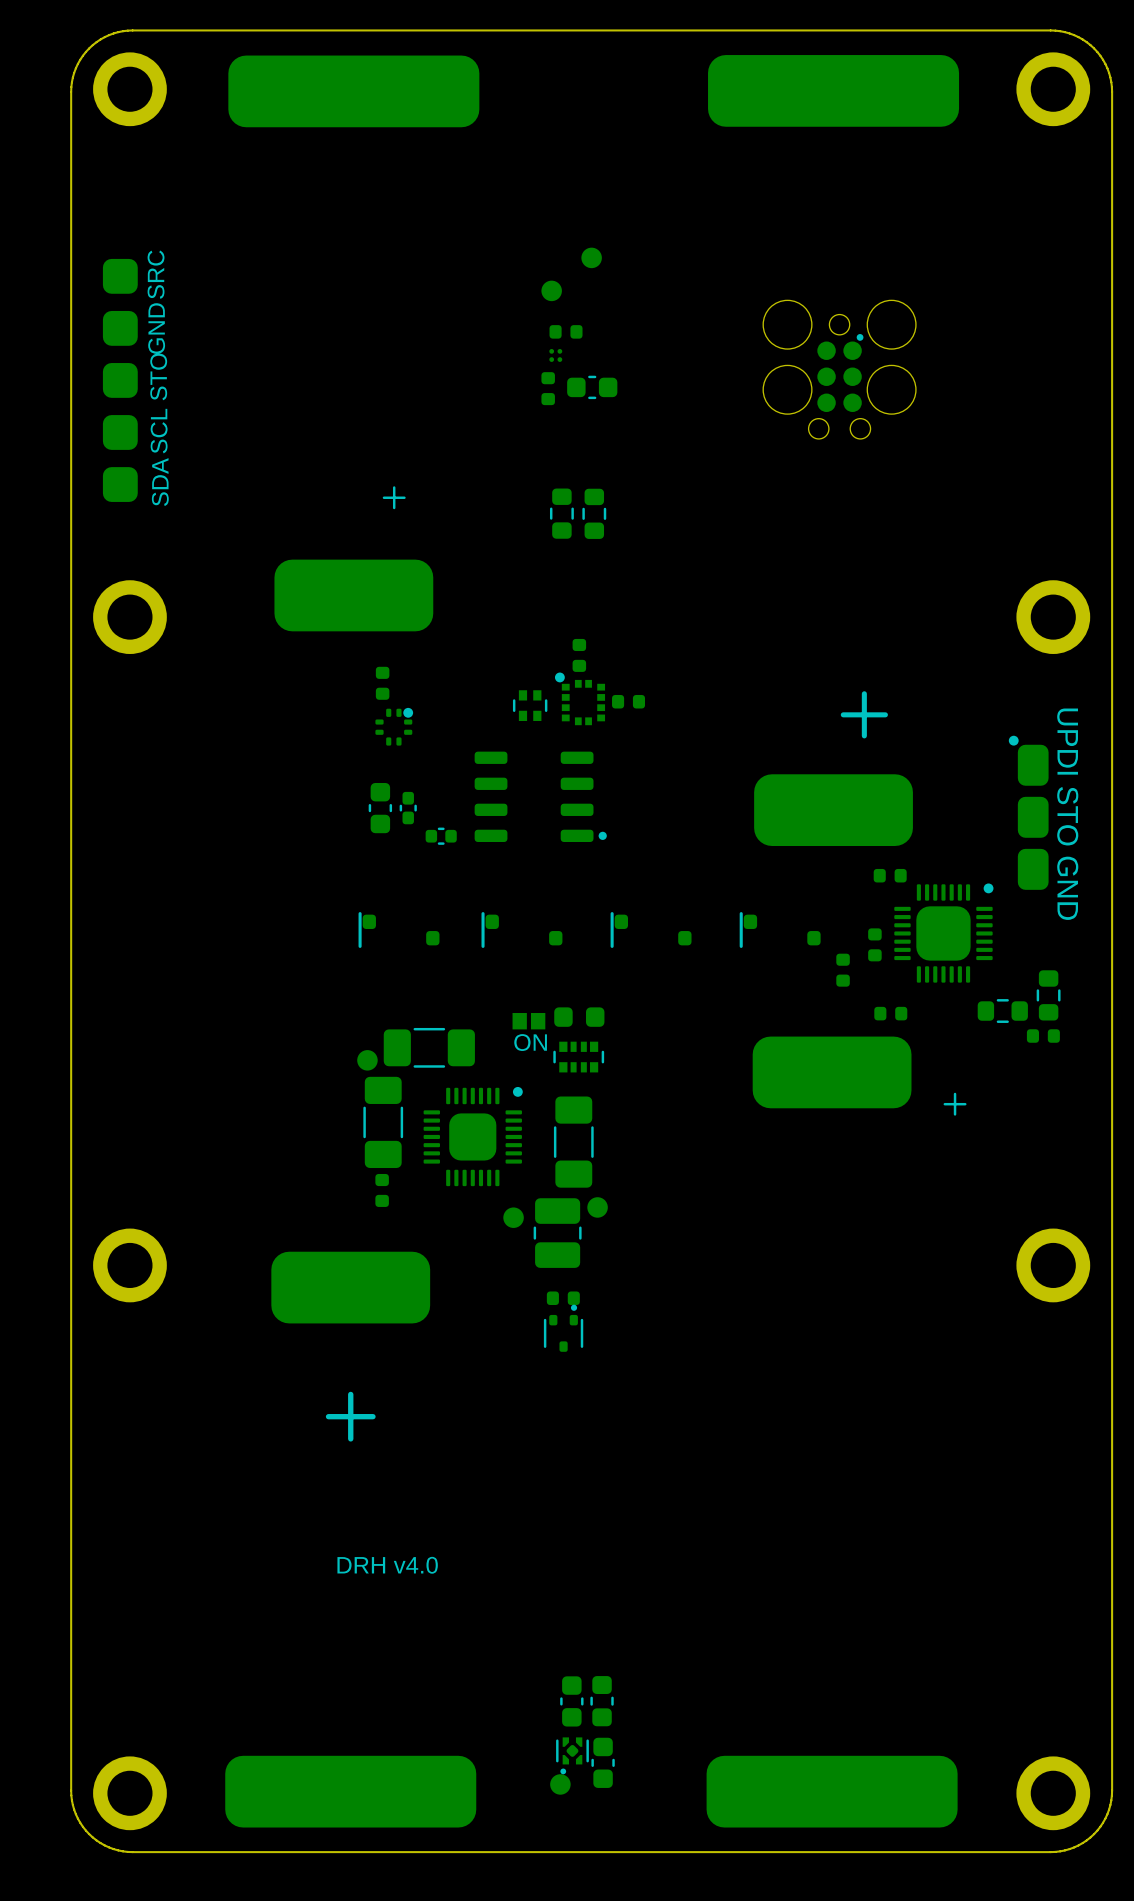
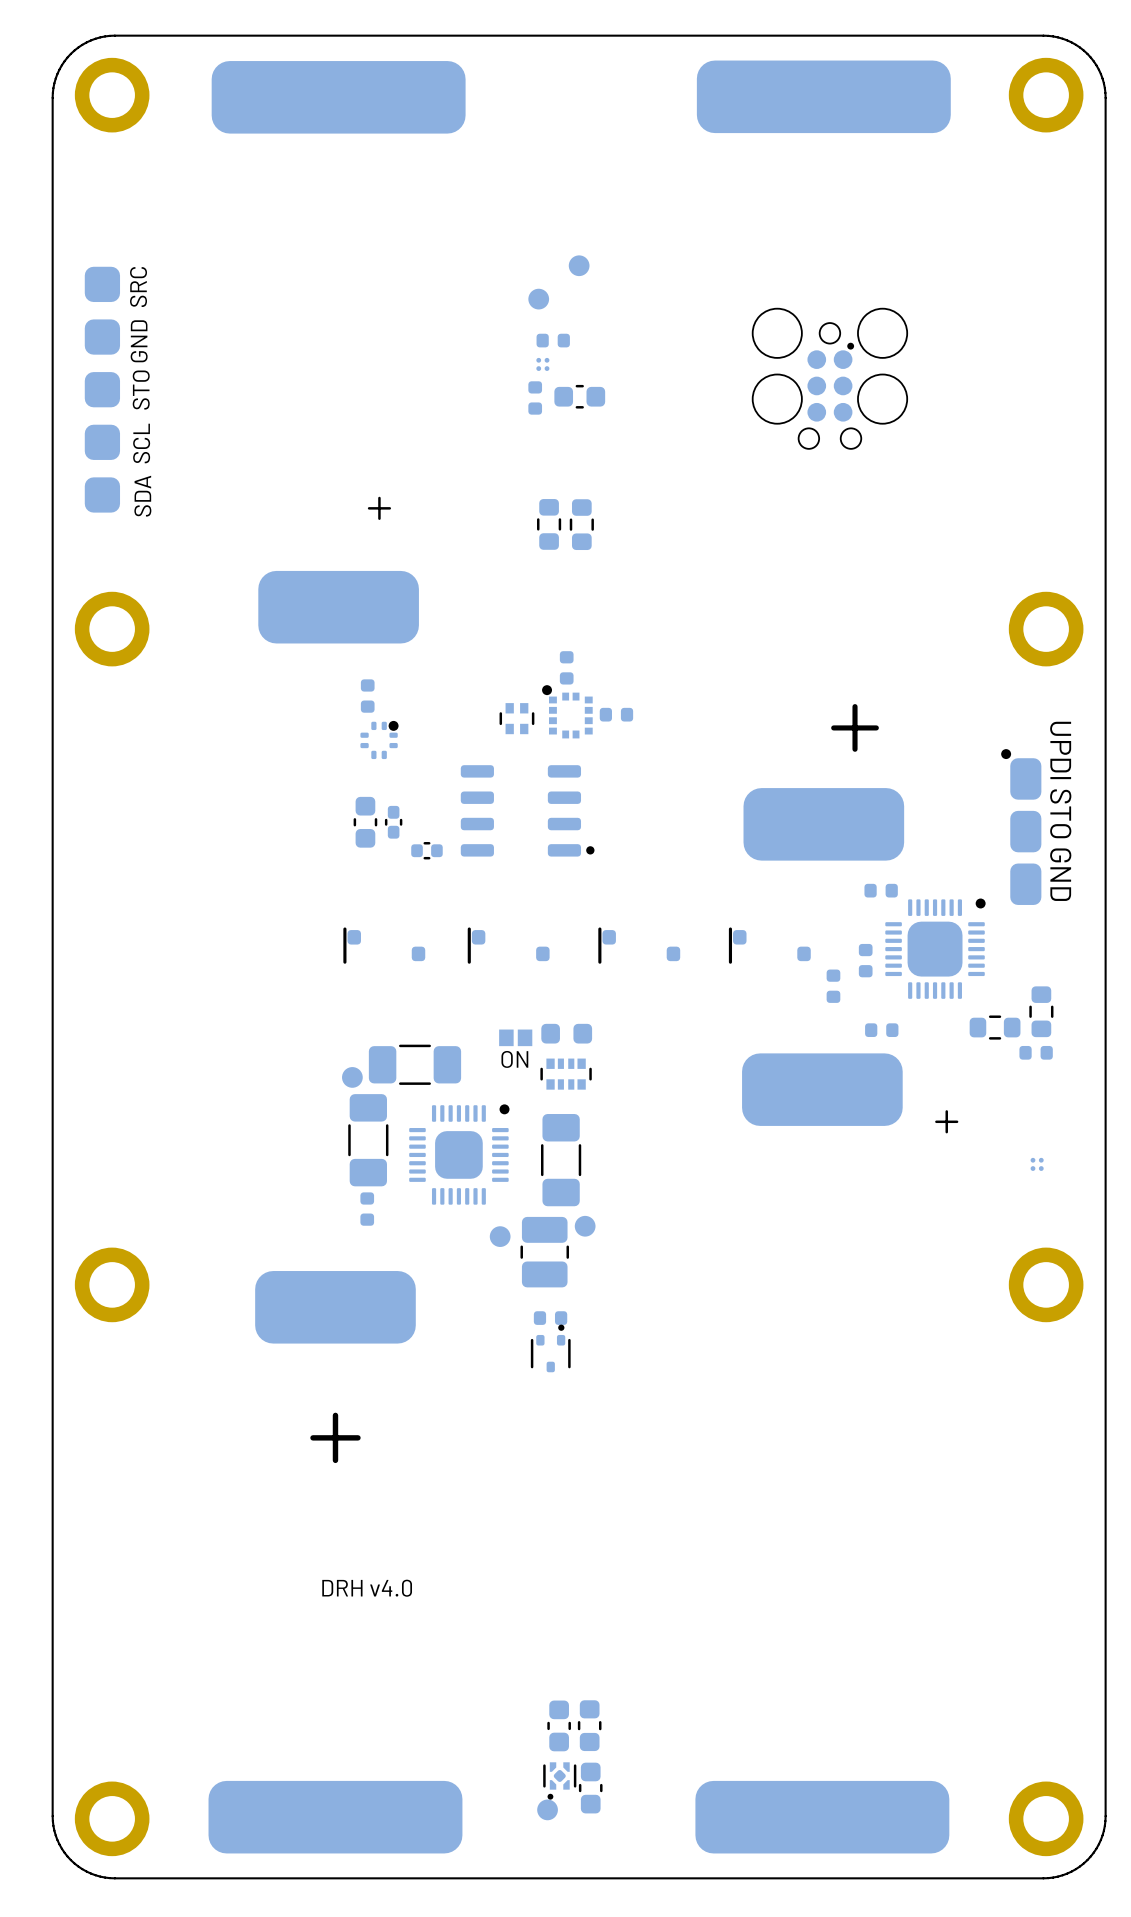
part: none -> (1037, 1164)

